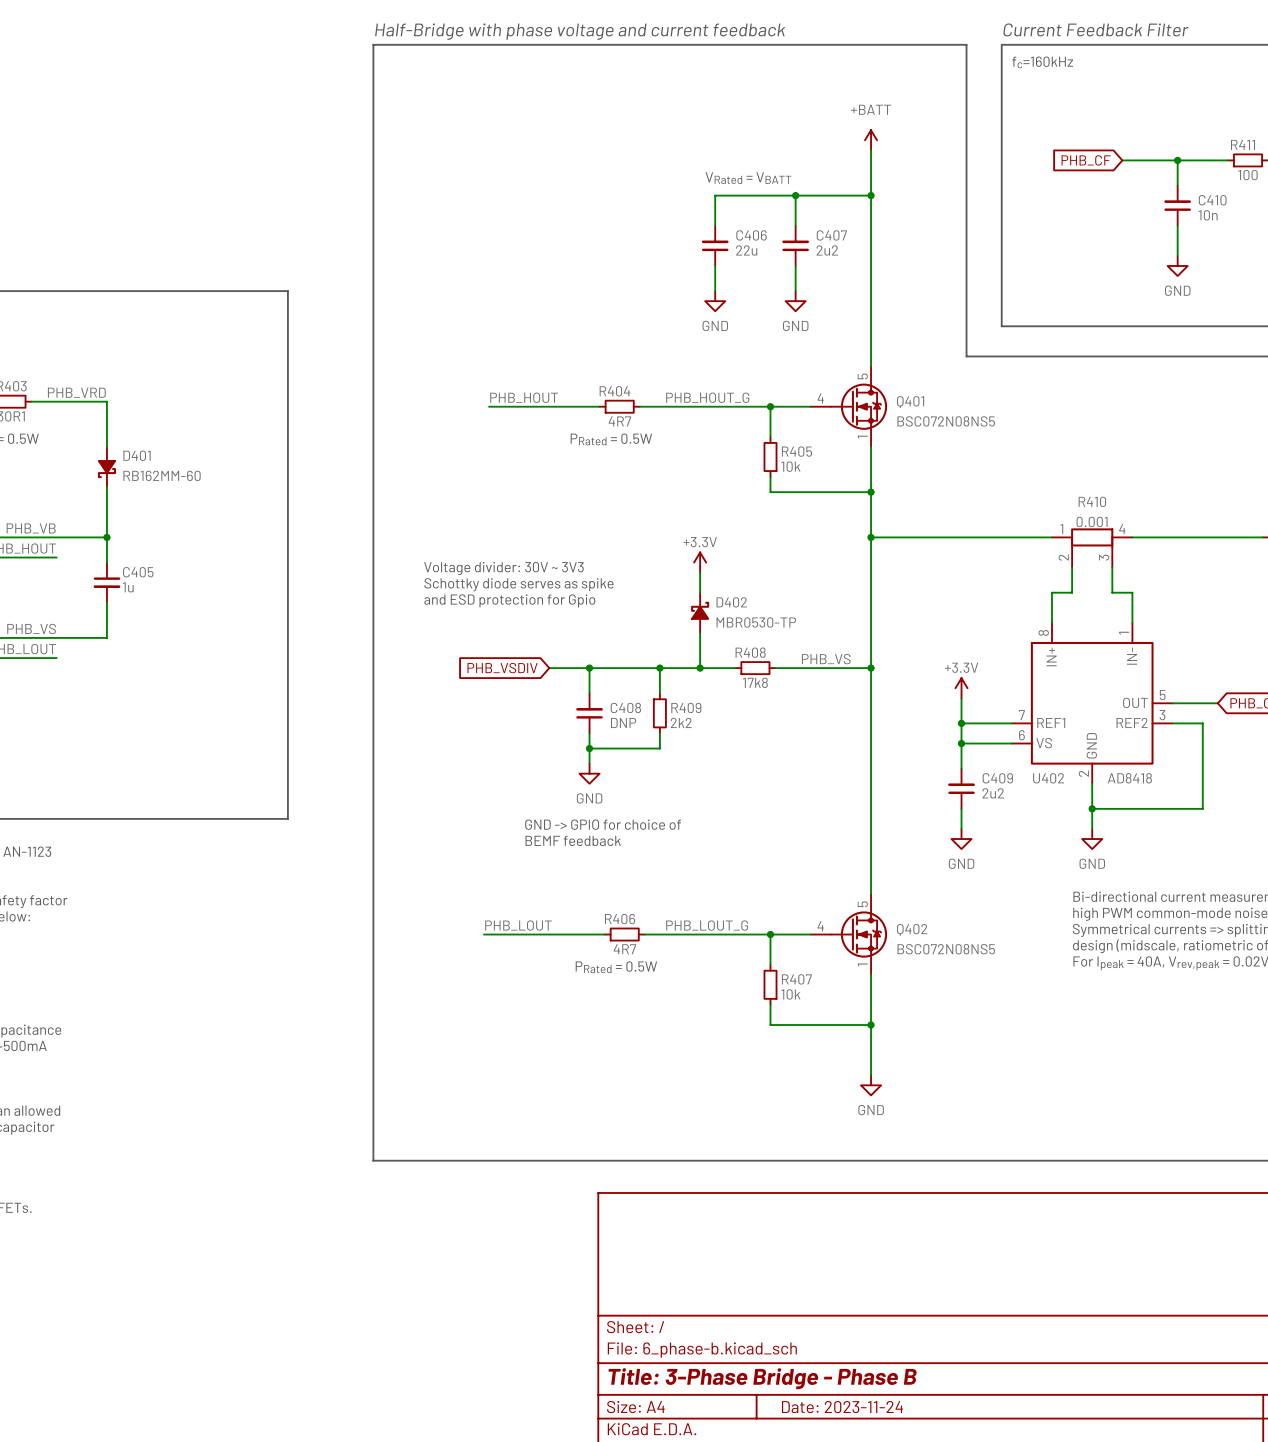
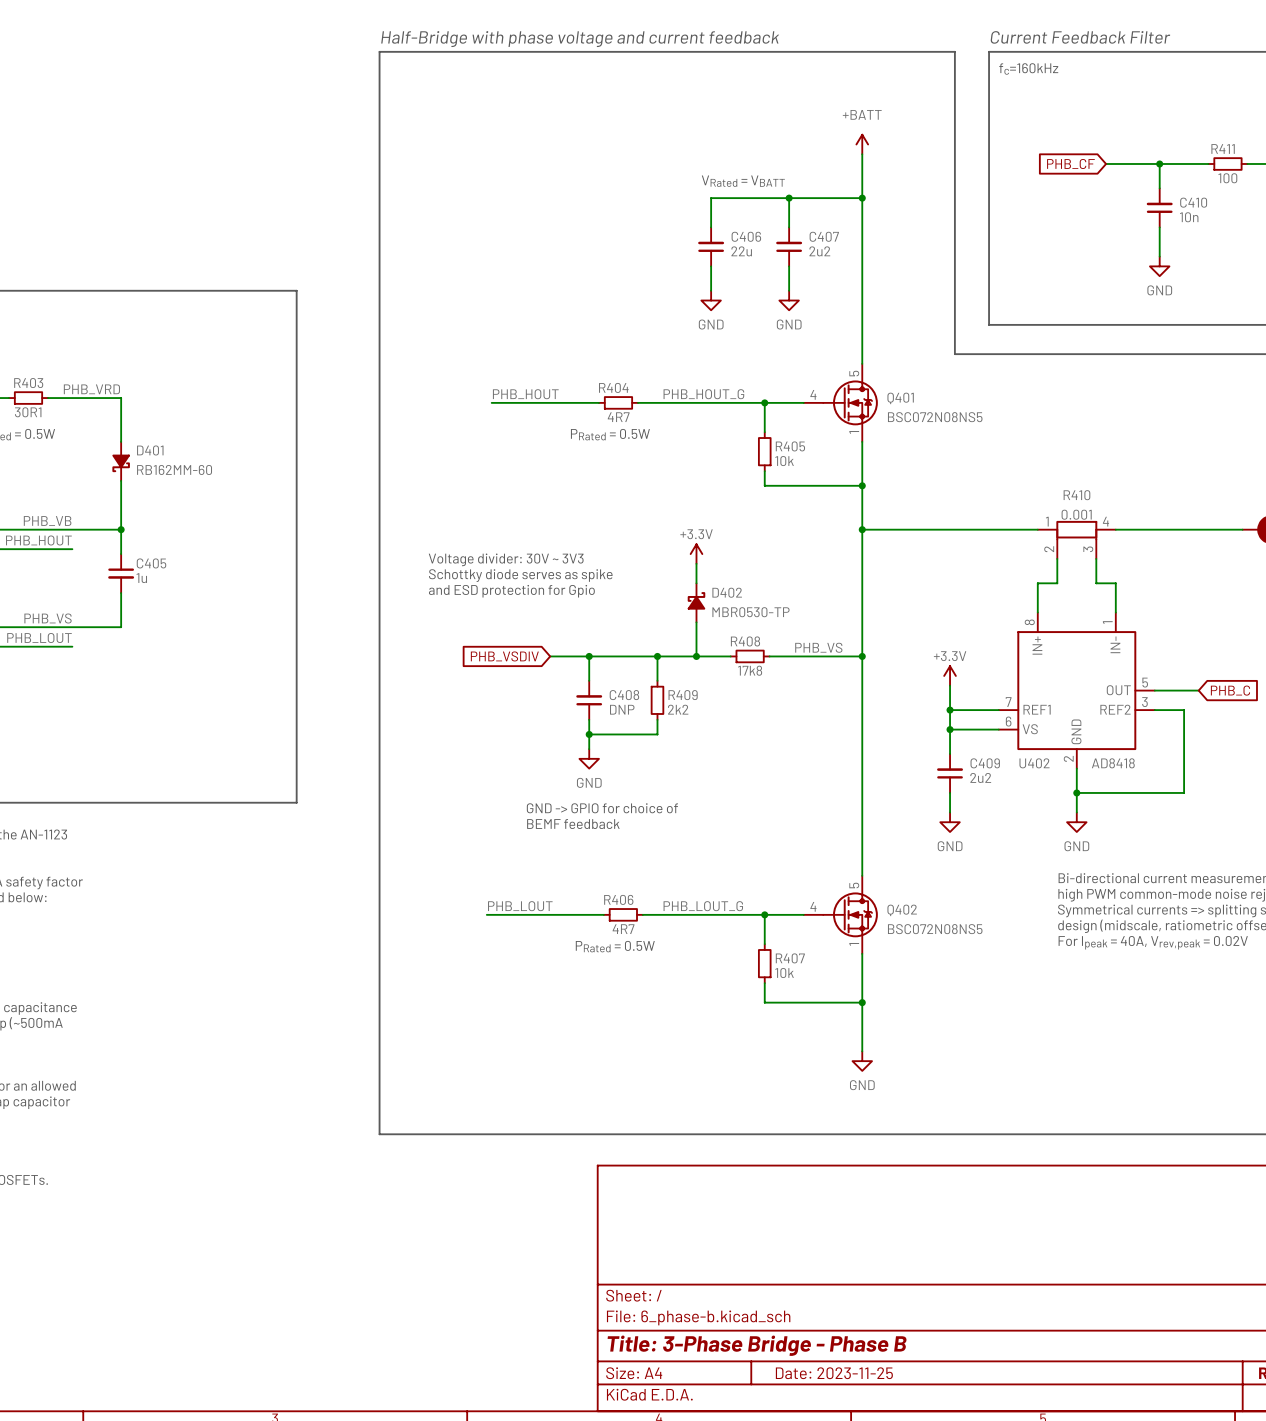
title block: Date: 2023-11-24 (842, 1407) -> Date: 2023-11-25 (834, 1373)

